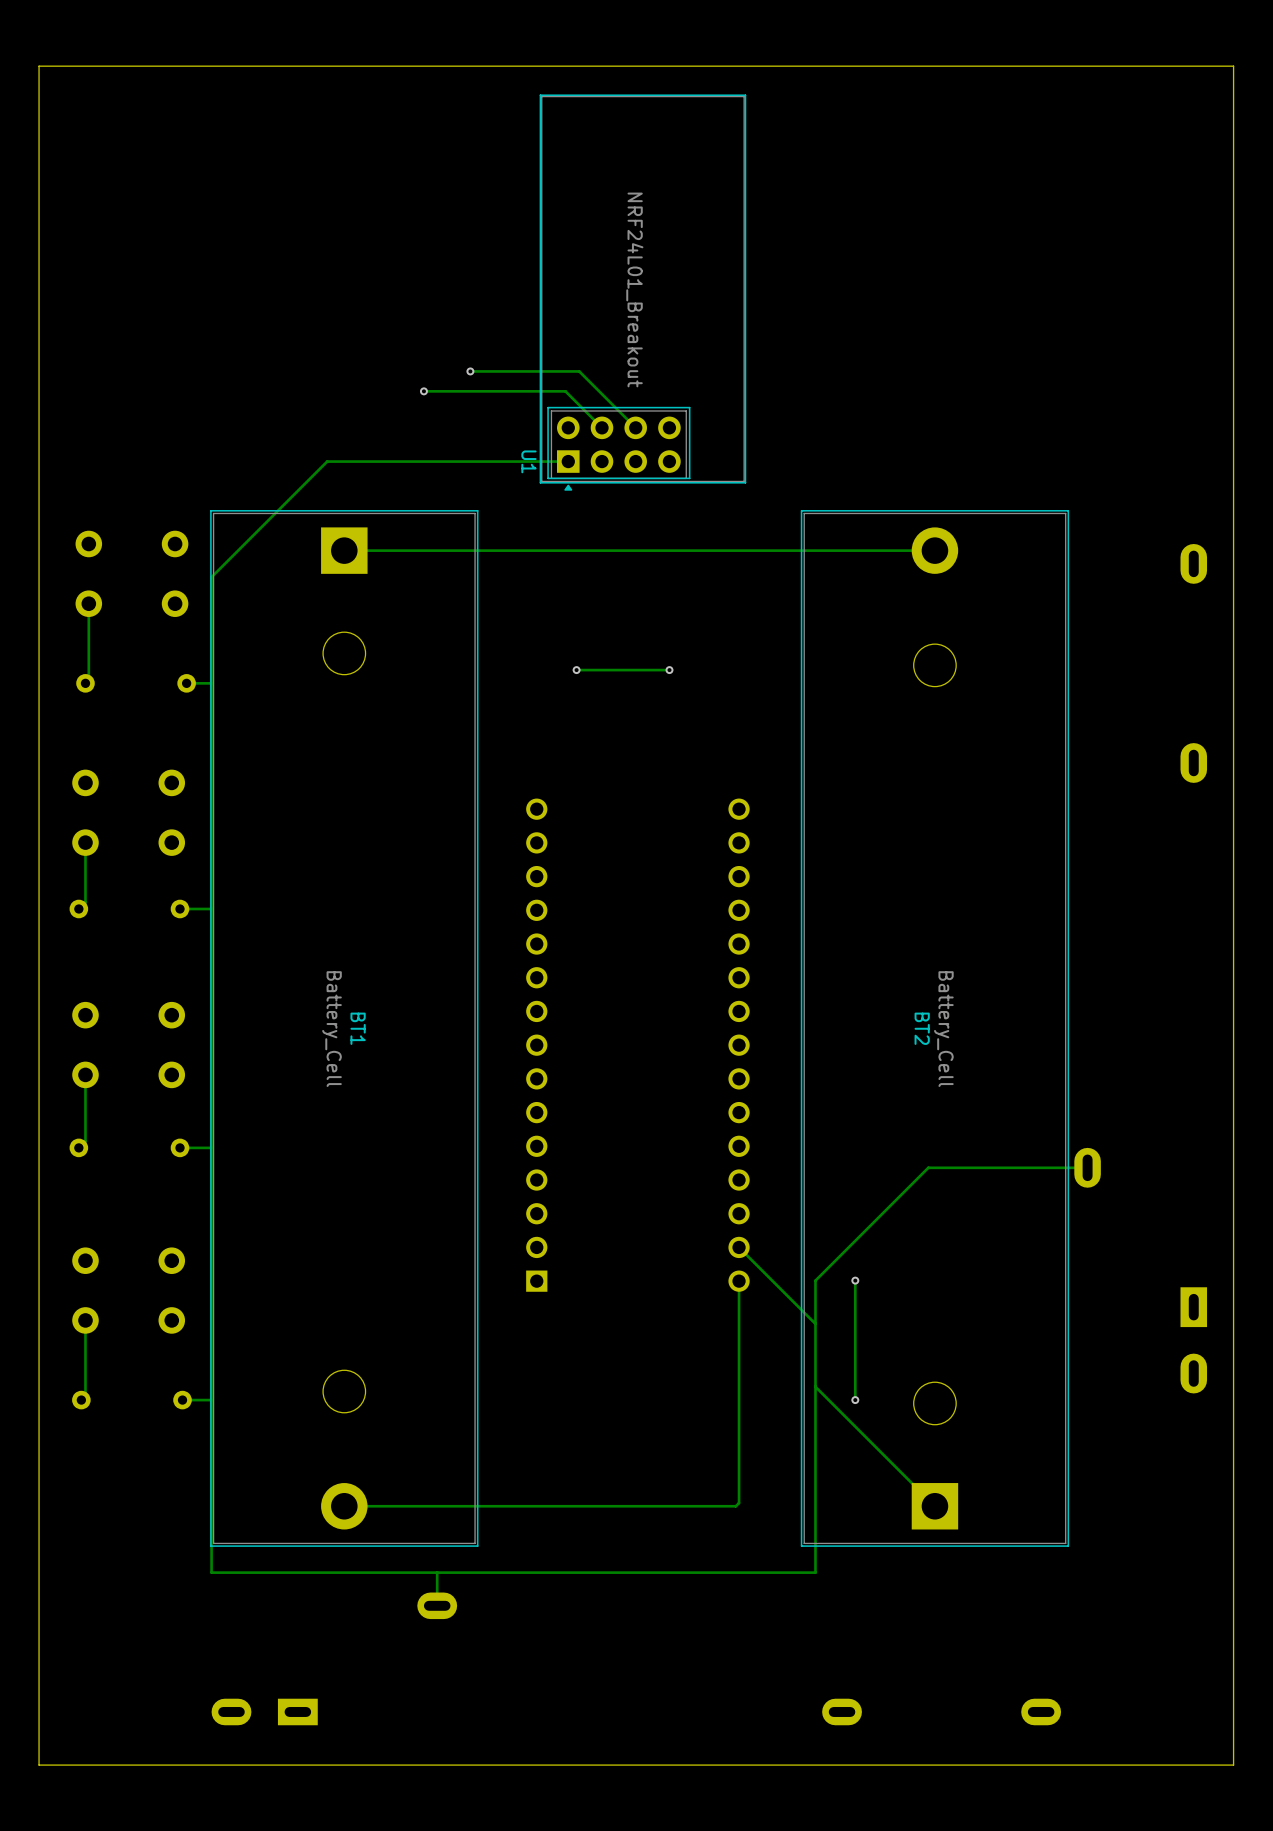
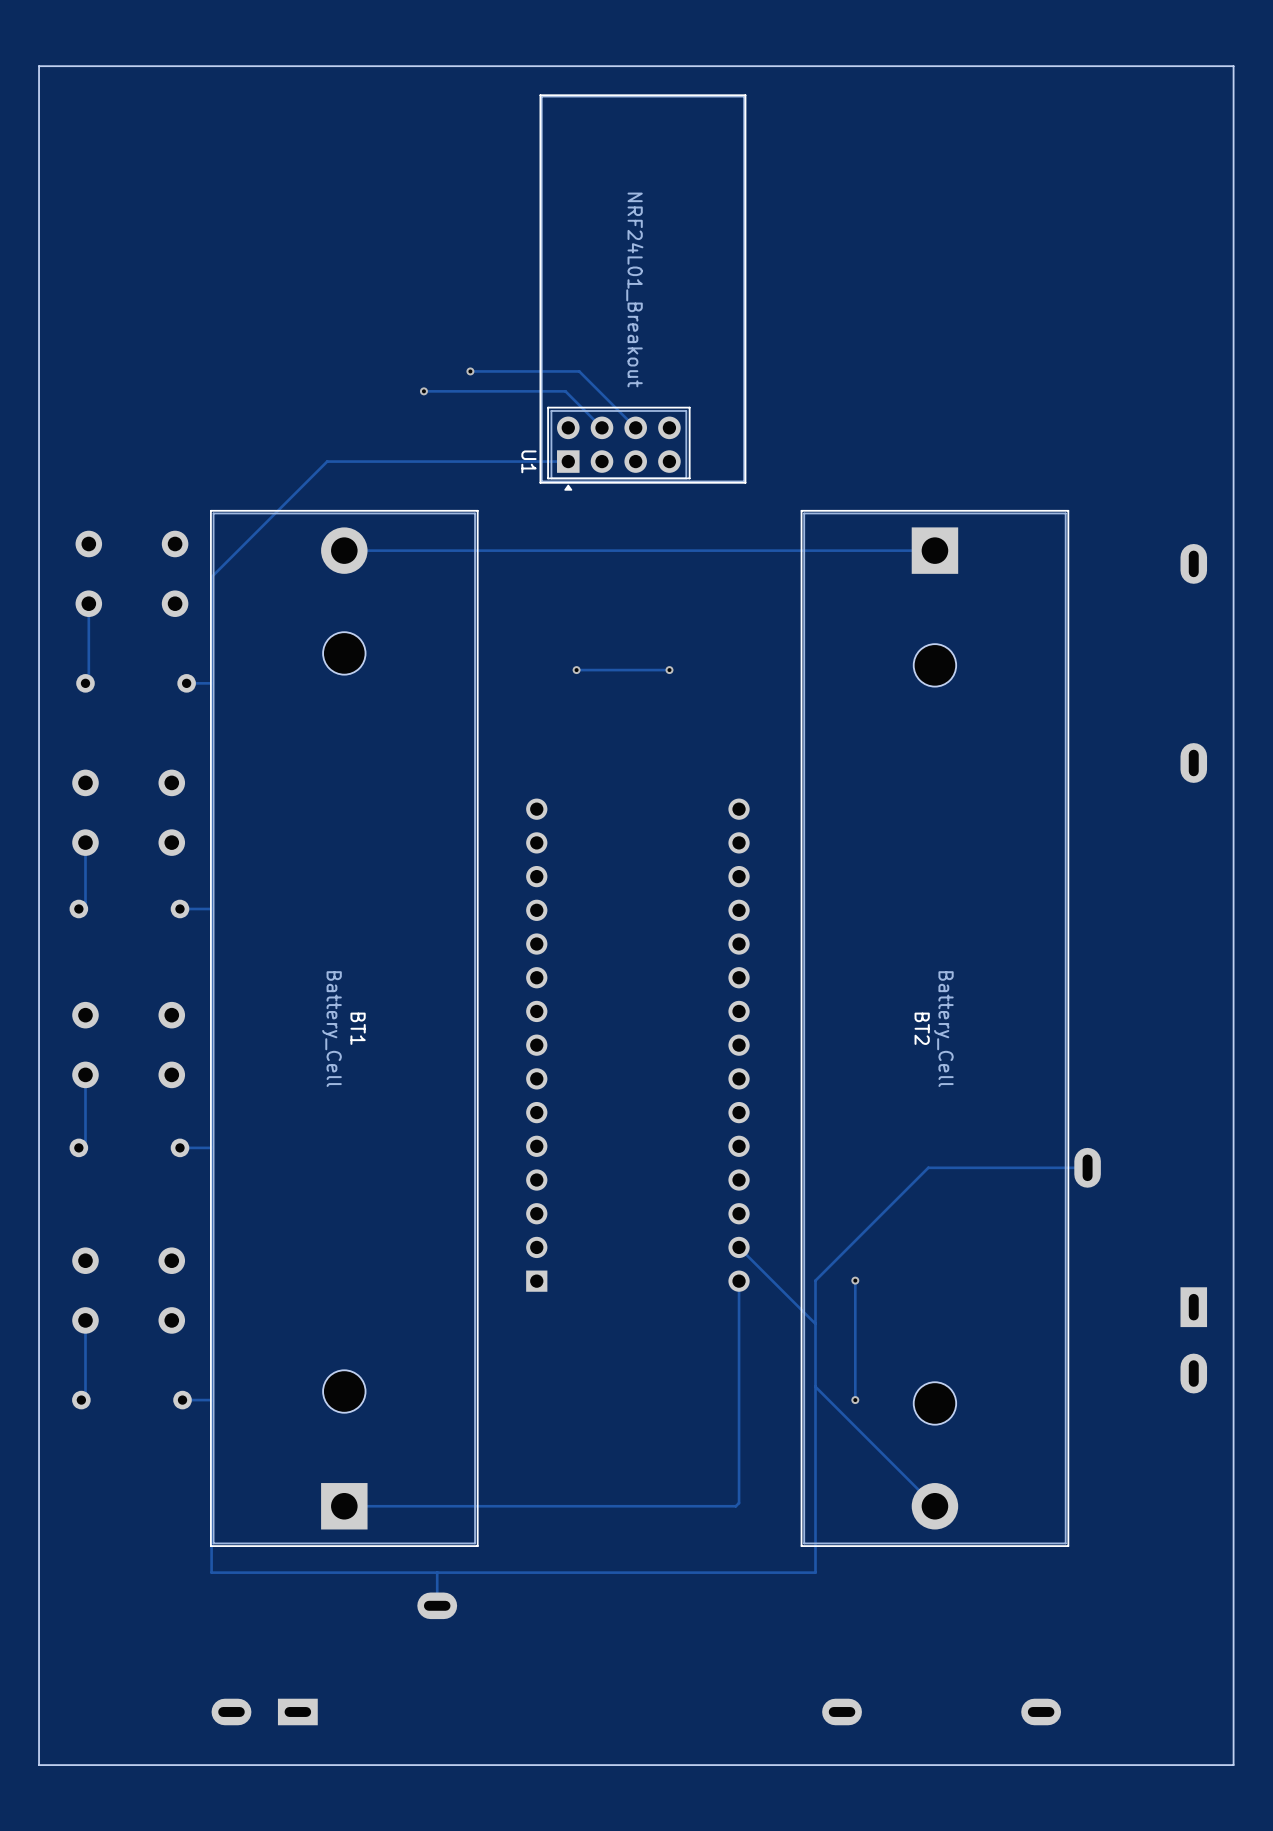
BT1 footprint: [210, 510, 479, 1547] -> [210, 510, 479, 1547]
BT2 footprint: [800, 510, 1070, 1547] -> [800, 510, 1070, 1547]

